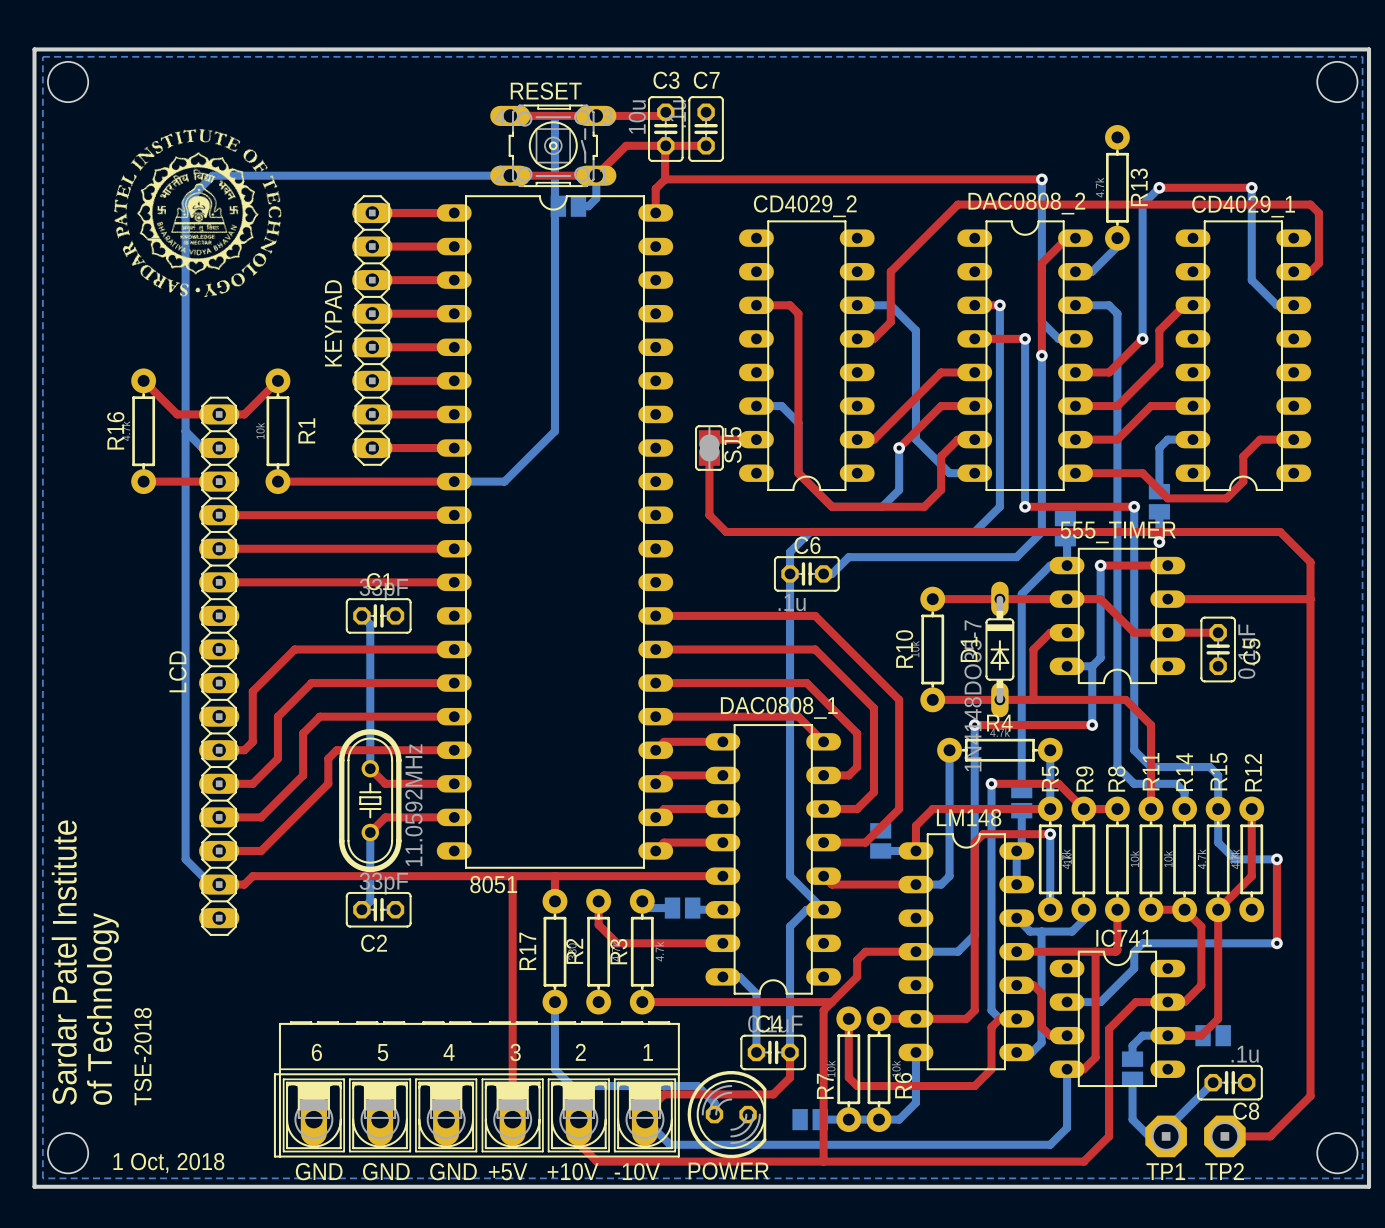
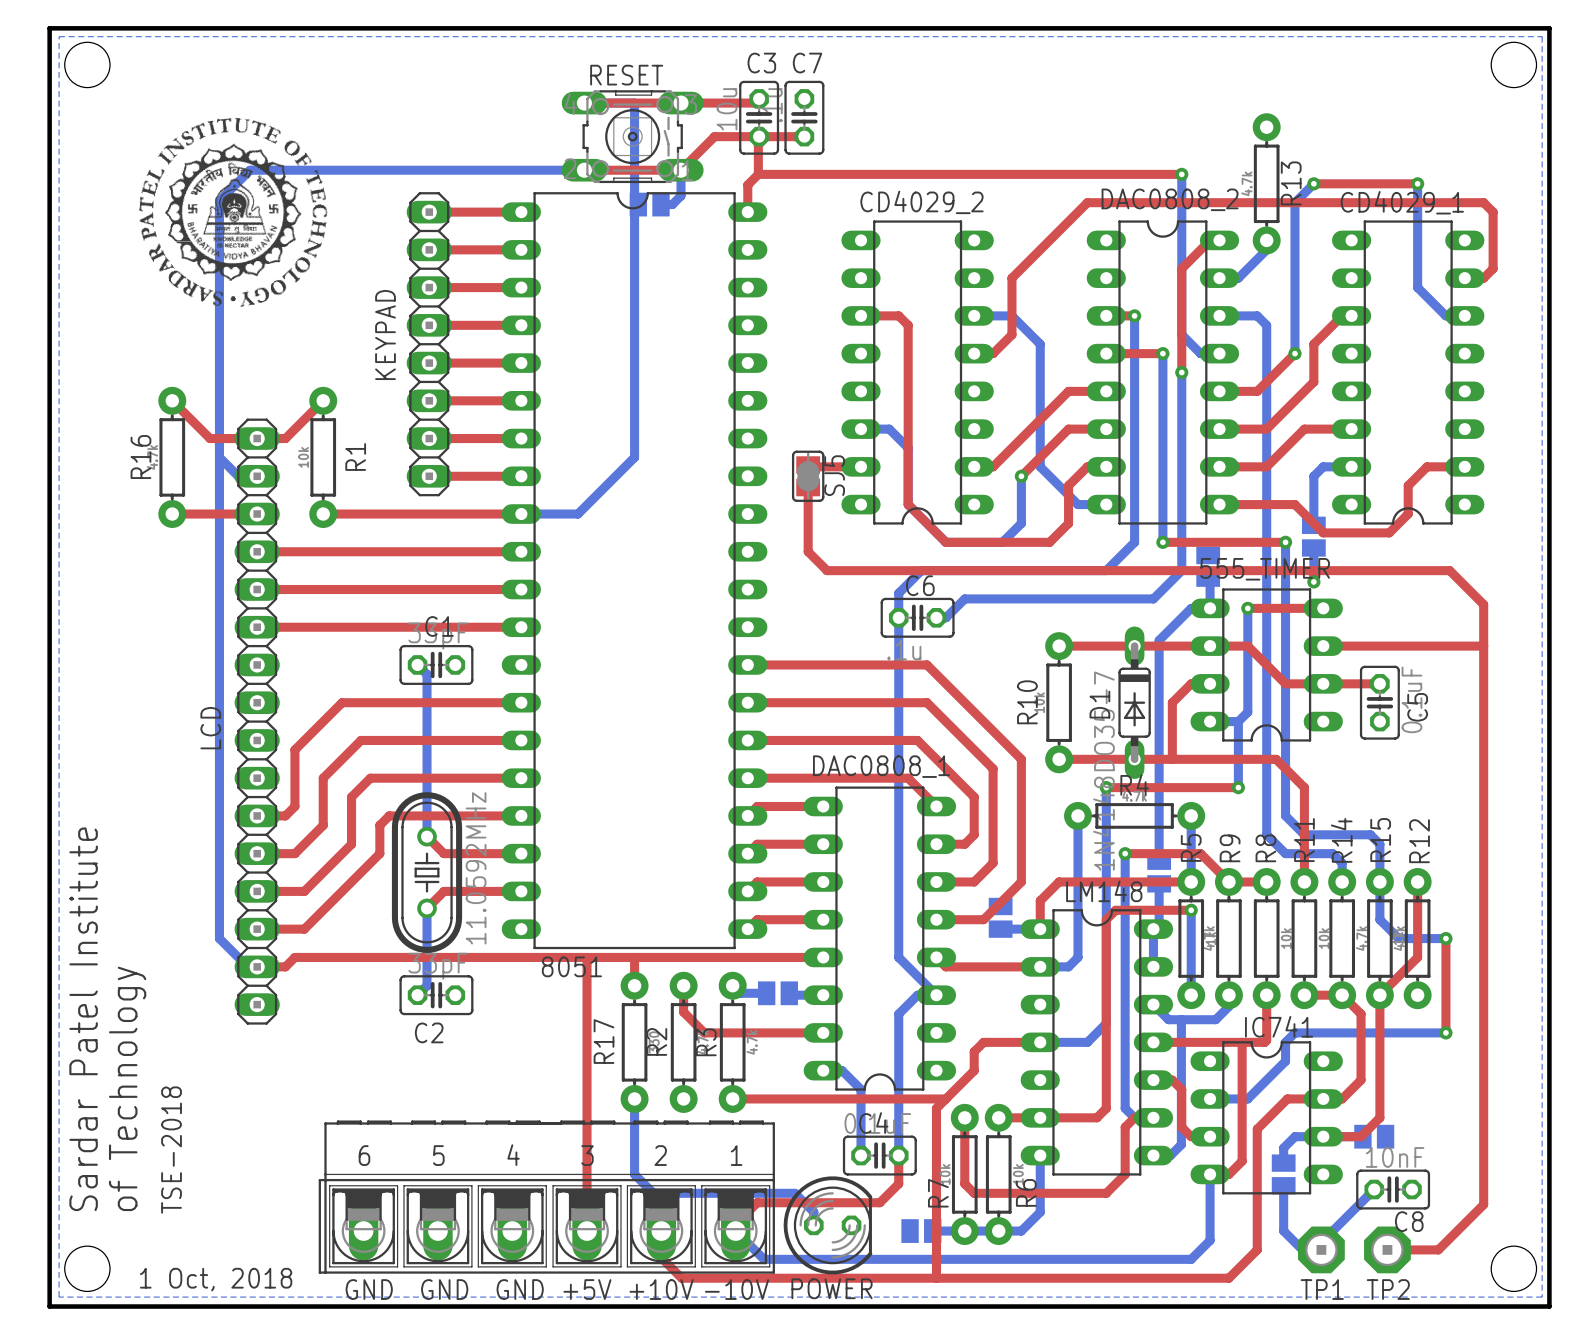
C8 value: .1u (1245, 1054) -> 10nF (1395, 1157)

